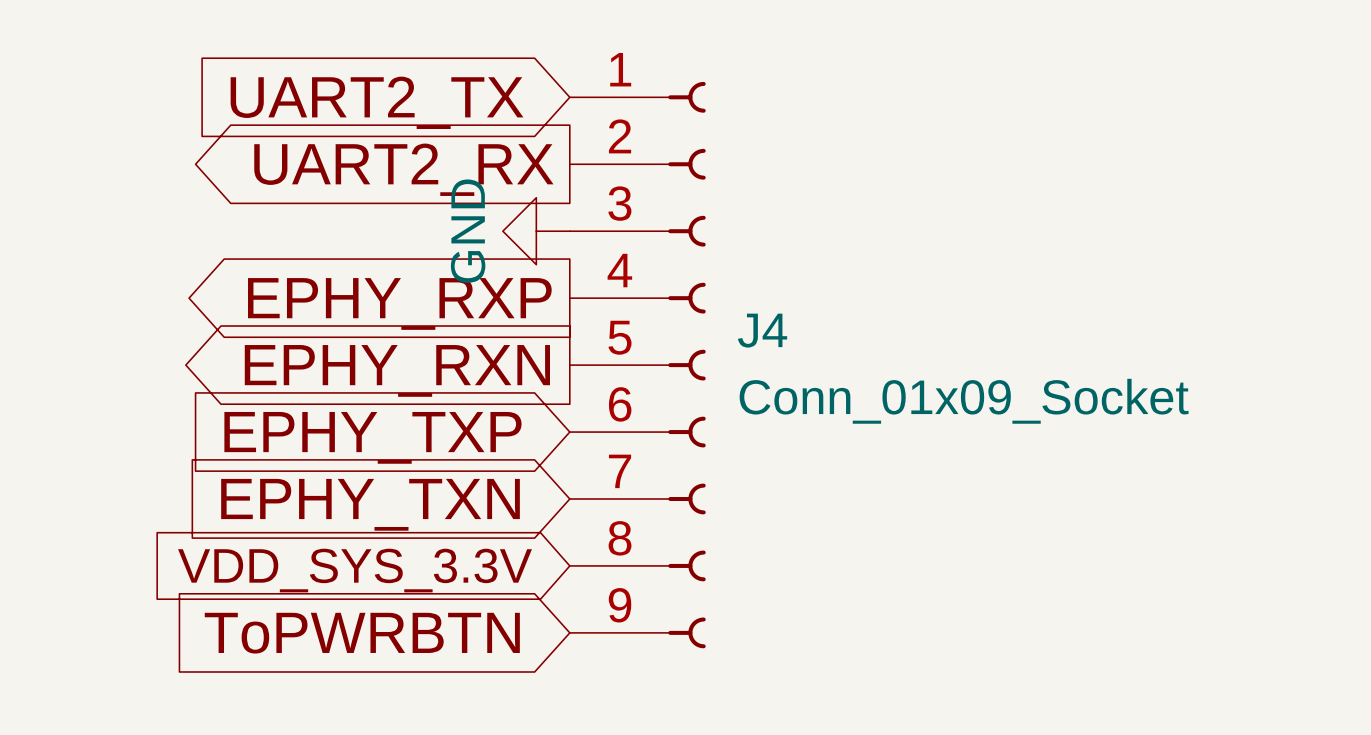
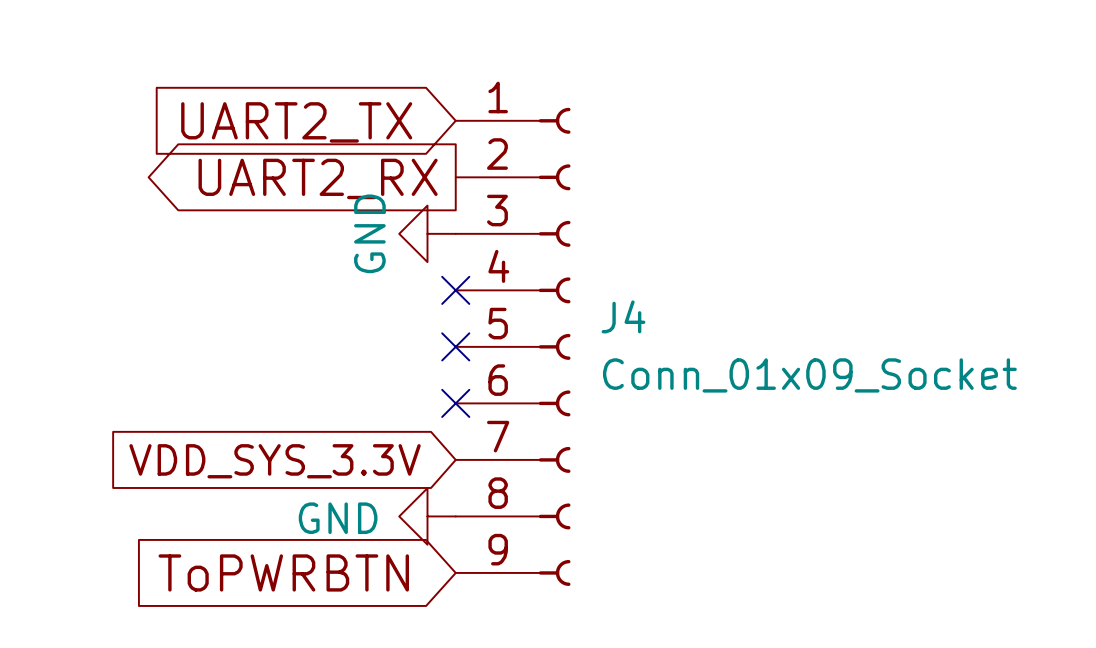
no-connect mark: none -> (455, 290)
global label: EPHY_RXP (399, 303) -> none
no-connect mark: none -> (455, 346)
global label: EPHY_RXN (397, 370) -> none
no-connect mark: none -> (455, 403)
global label: EPHY_TXP (372, 437) -> none
global label: EPHY_TXN (370, 504) -> VDD_SYS_3.3V (275, 461)
power symbol: none -> GND (427, 516)
global label: VDD_SYS_3.3V (355, 570) -> none

